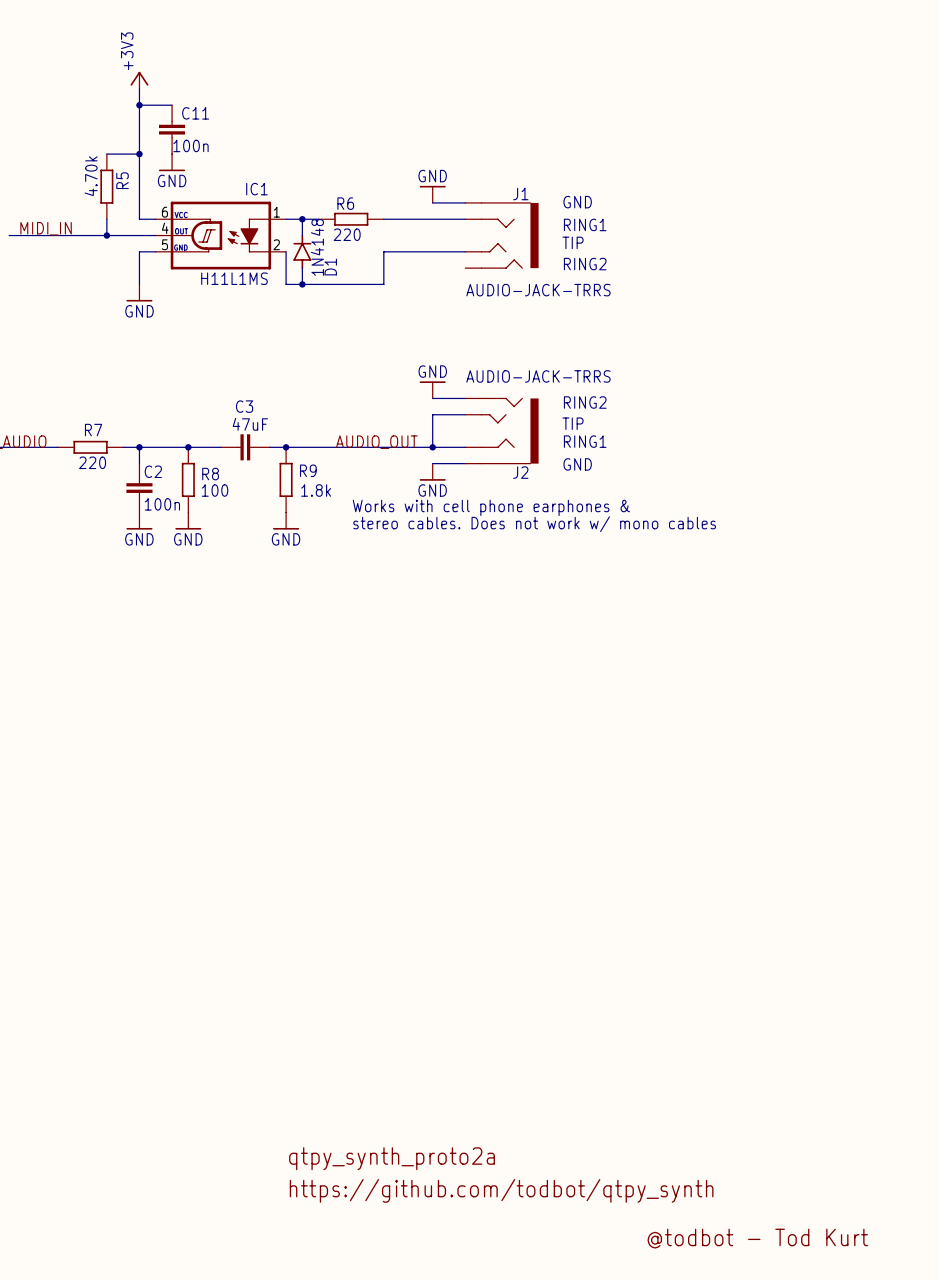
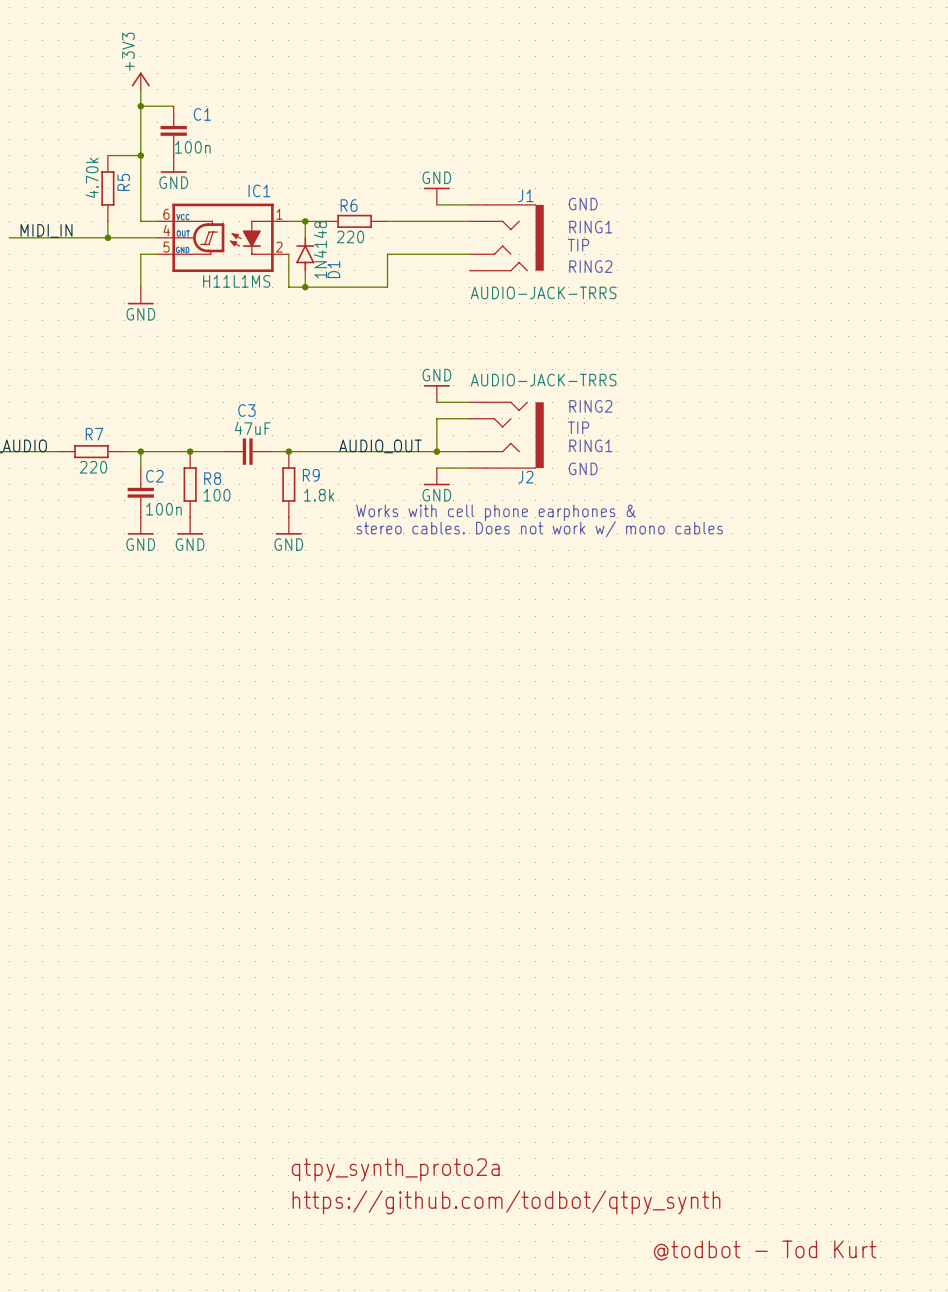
C11 name: C11 (195, 113) -> C1 (202, 114)

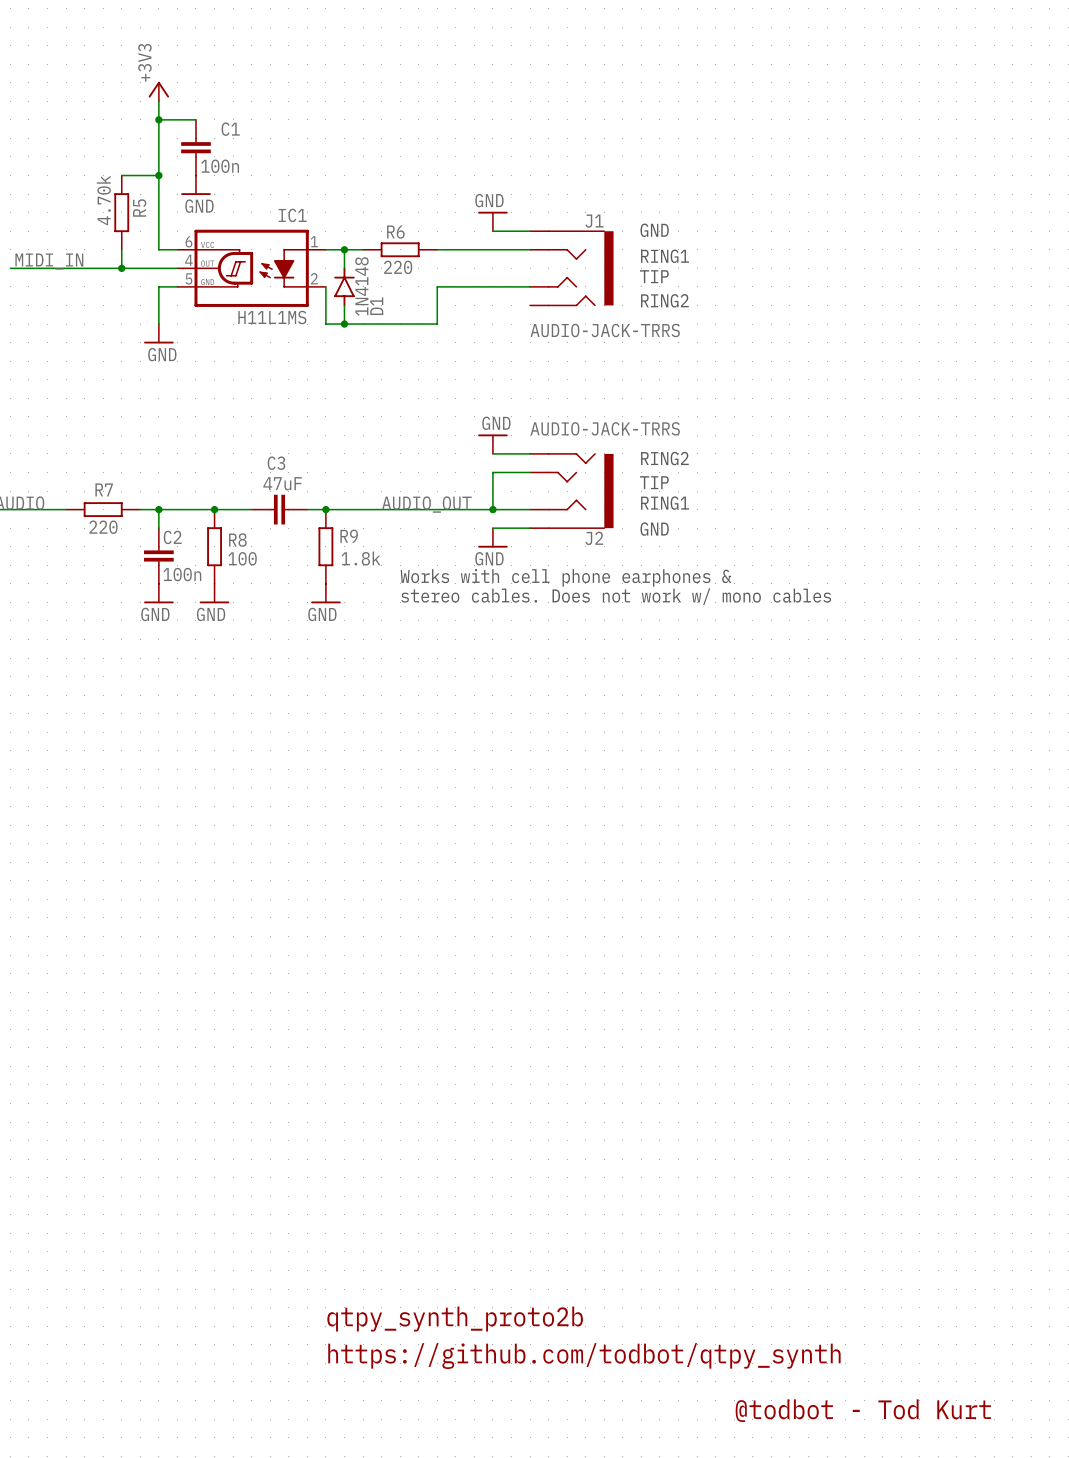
text: qtpy_synth_proto2a (395, 1169) -> qtpy_synth_proto2b (455, 1319)

